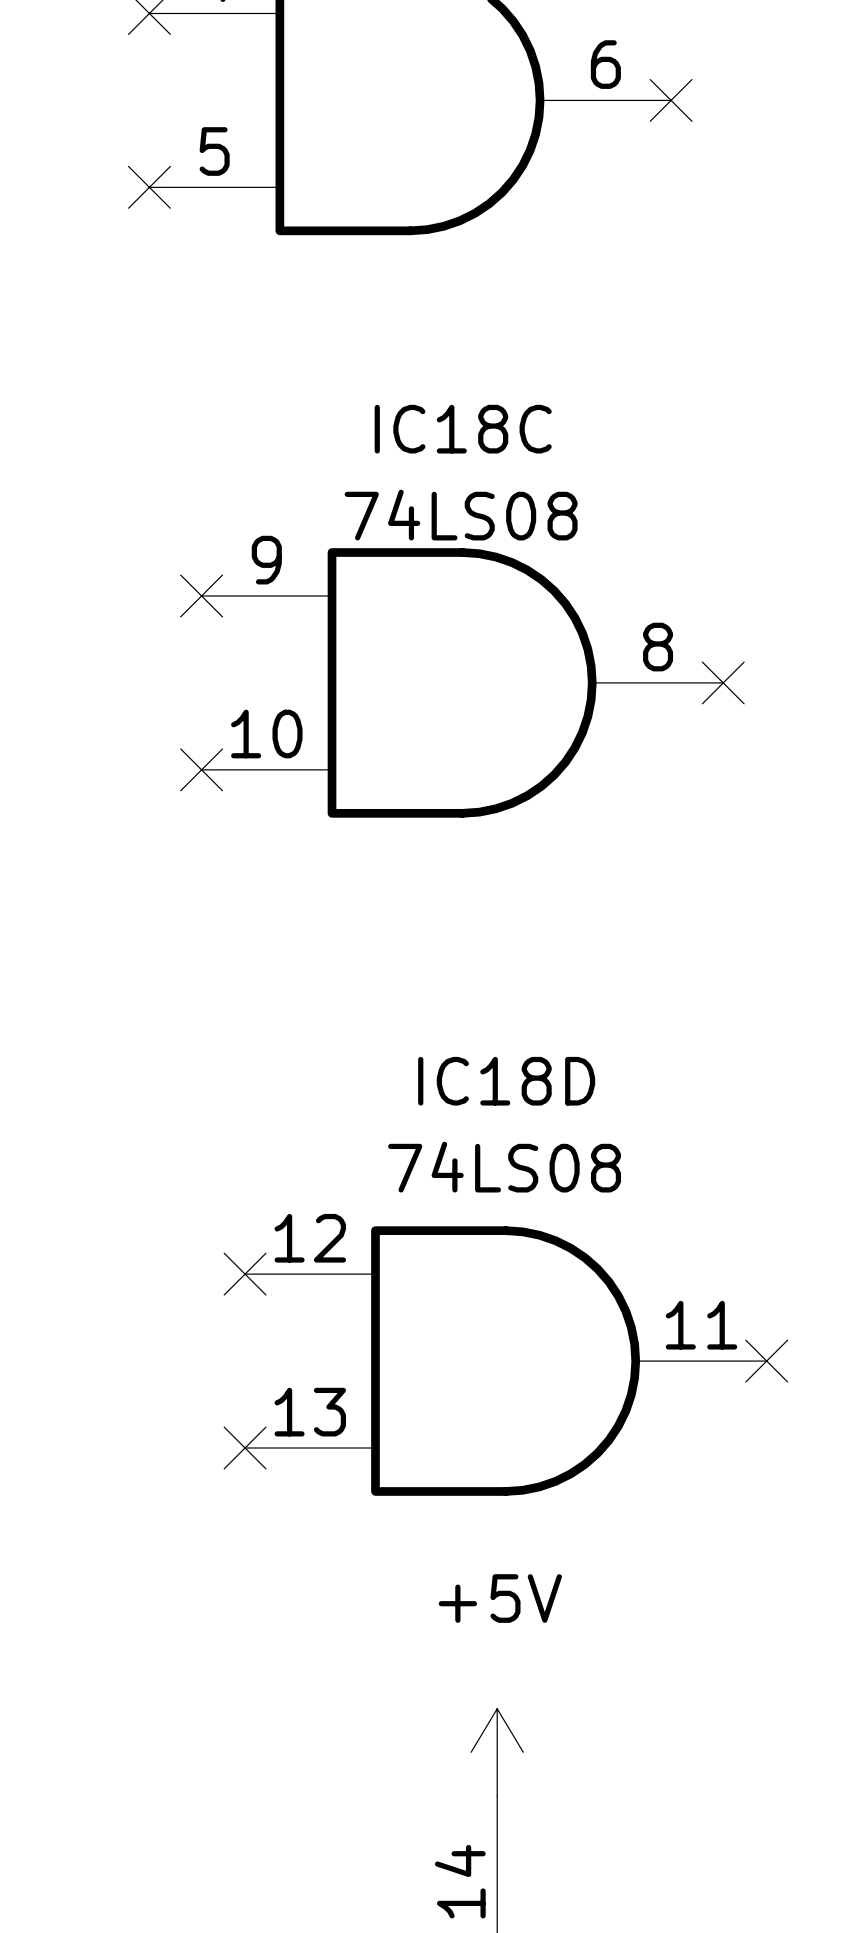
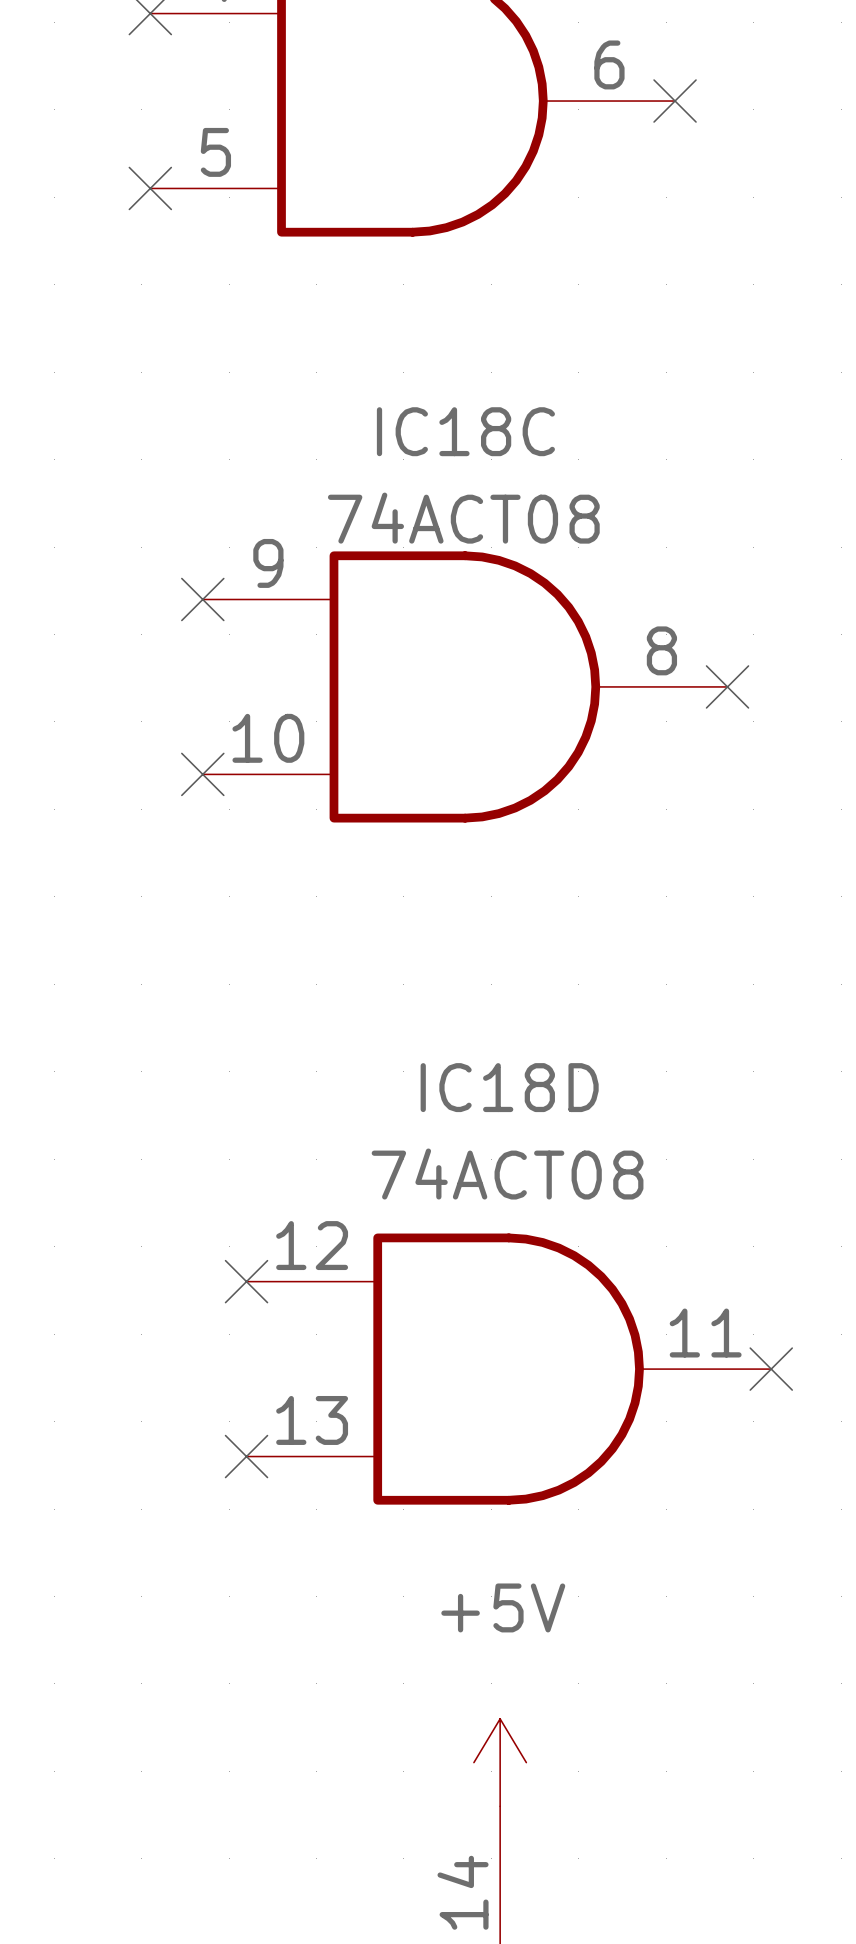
IC18C value: 74LS08 (461, 515) -> 74ACT08 (463, 518)
IC18D value: 74LS08 (504, 1167) -> 74ACT08 (507, 1174)

